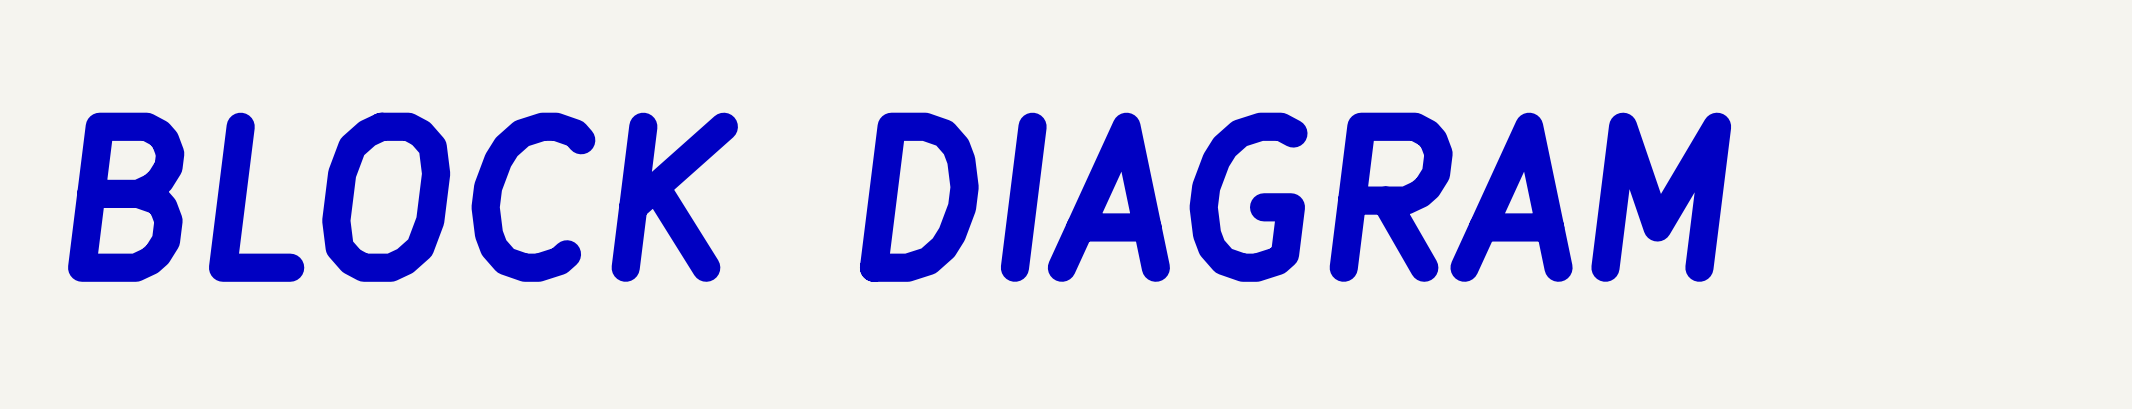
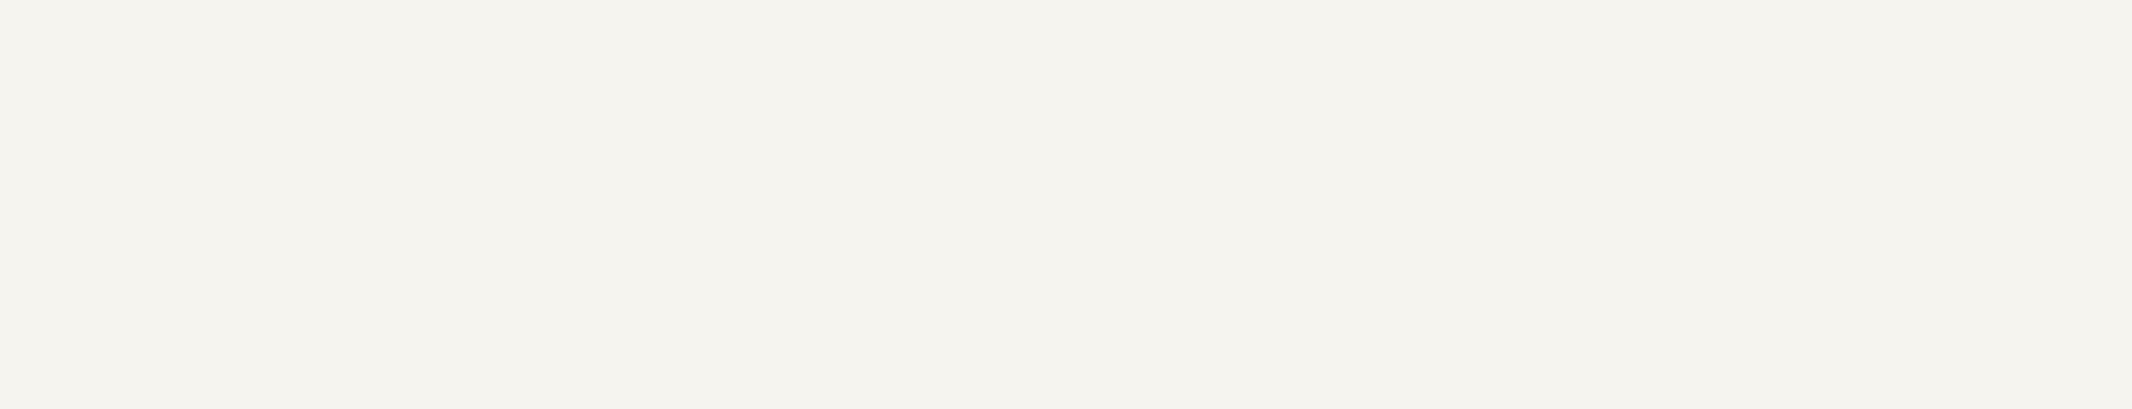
text: BLOCK DIAGRAM (899, 197) -> none

